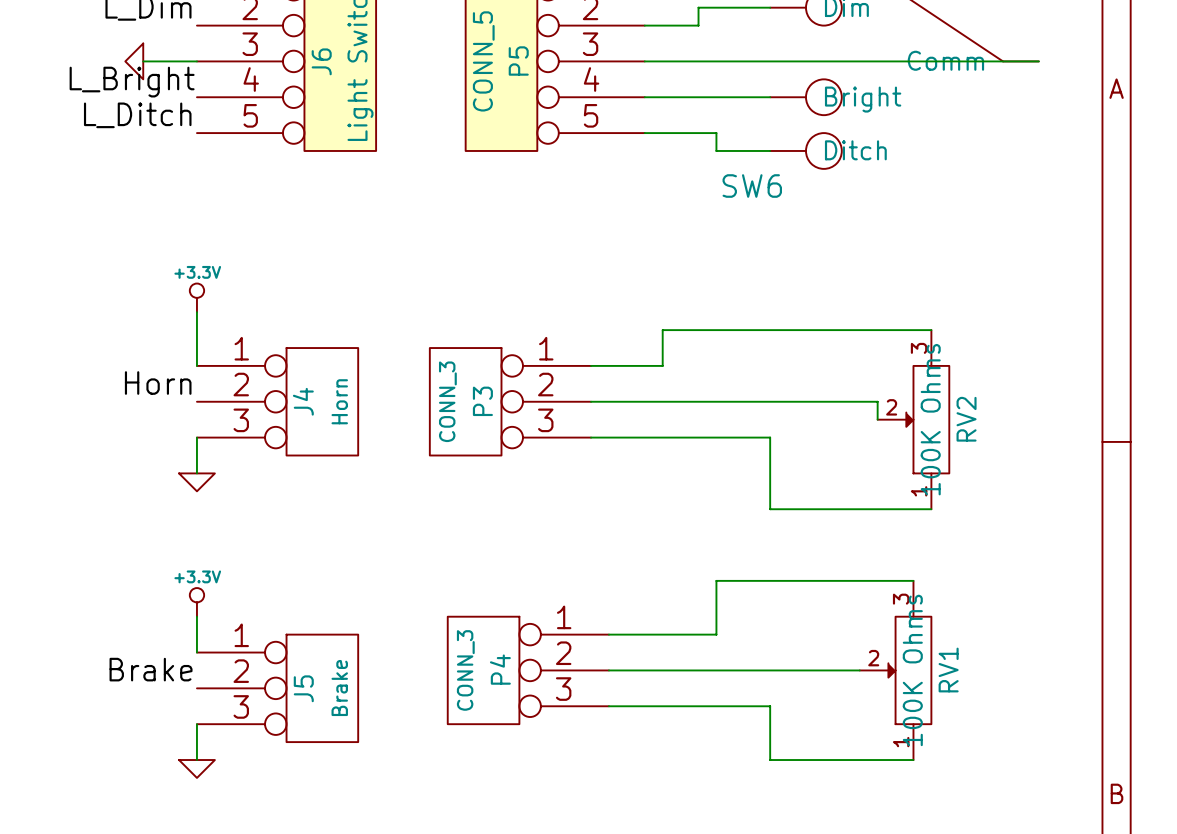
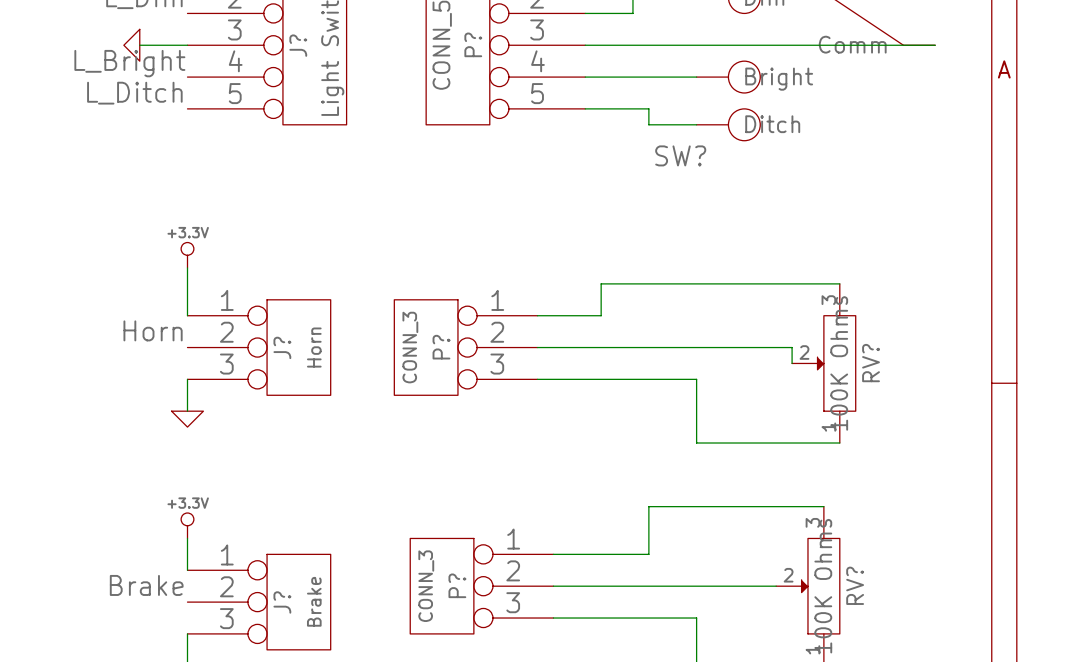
J6 name: J6 (321, 61) -> J? (298, 45)
P5 name: P5 (518, 61) -> P? (473, 44)
SW6 name: SW6 (752, 186) -> SW? (680, 155)
J4 name: J4 (303, 401) -> J? (282, 347)
P3 name: P3 (482, 401) -> P? (441, 347)
RV2 name: RV2 (966, 419) -> RV? (871, 363)
P4 name: P4 (500, 669) -> P? (457, 585)
RV1 name: RV1 (948, 670) -> RV? (855, 585)
J5 name: J5 (303, 688) -> J? (282, 602)

